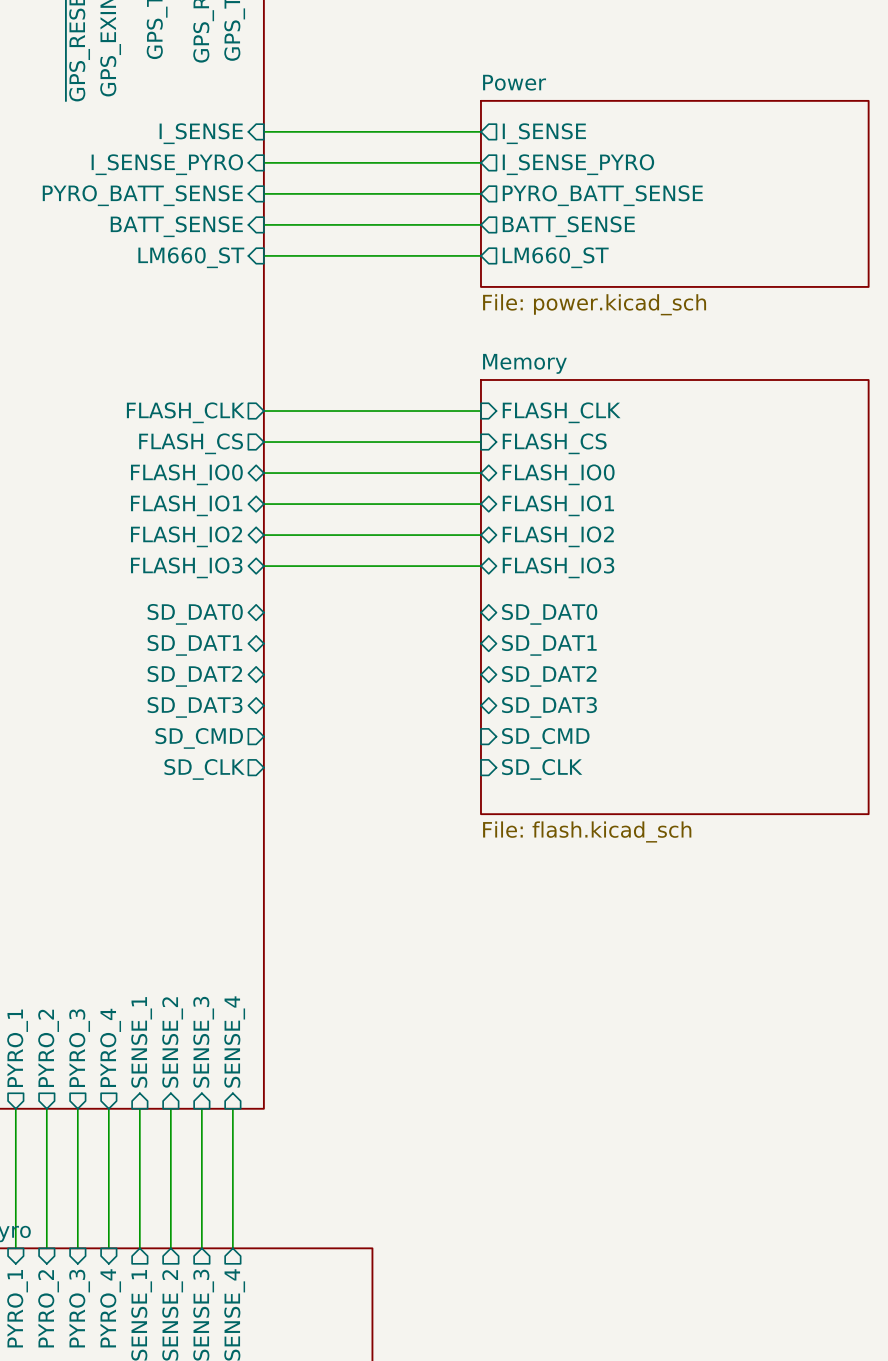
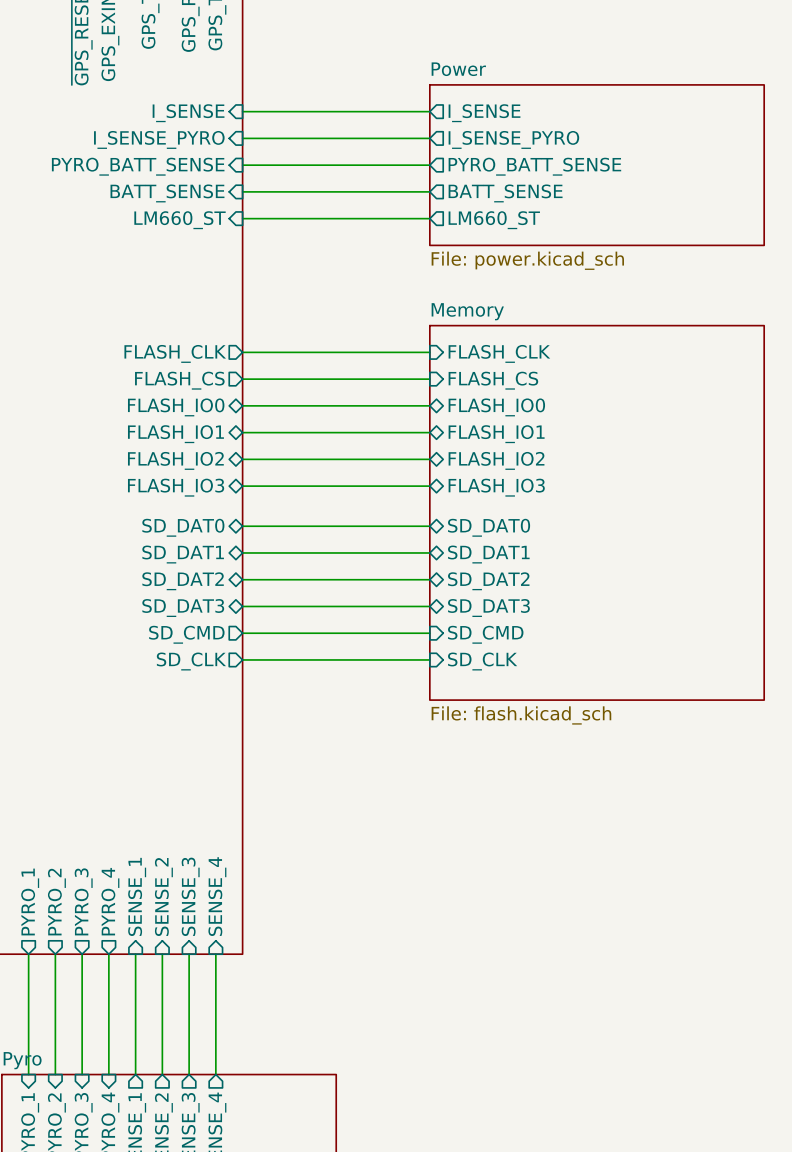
wire: none -> (242, 526) (429, 526)
wire: none -> (242, 552) (429, 552)
wire: none -> (242, 579) (429, 579)
wire: none -> (242, 606) (429, 606)
wire: none -> (242, 633) (429, 633)
wire: none -> (242, 659) (429, 659)

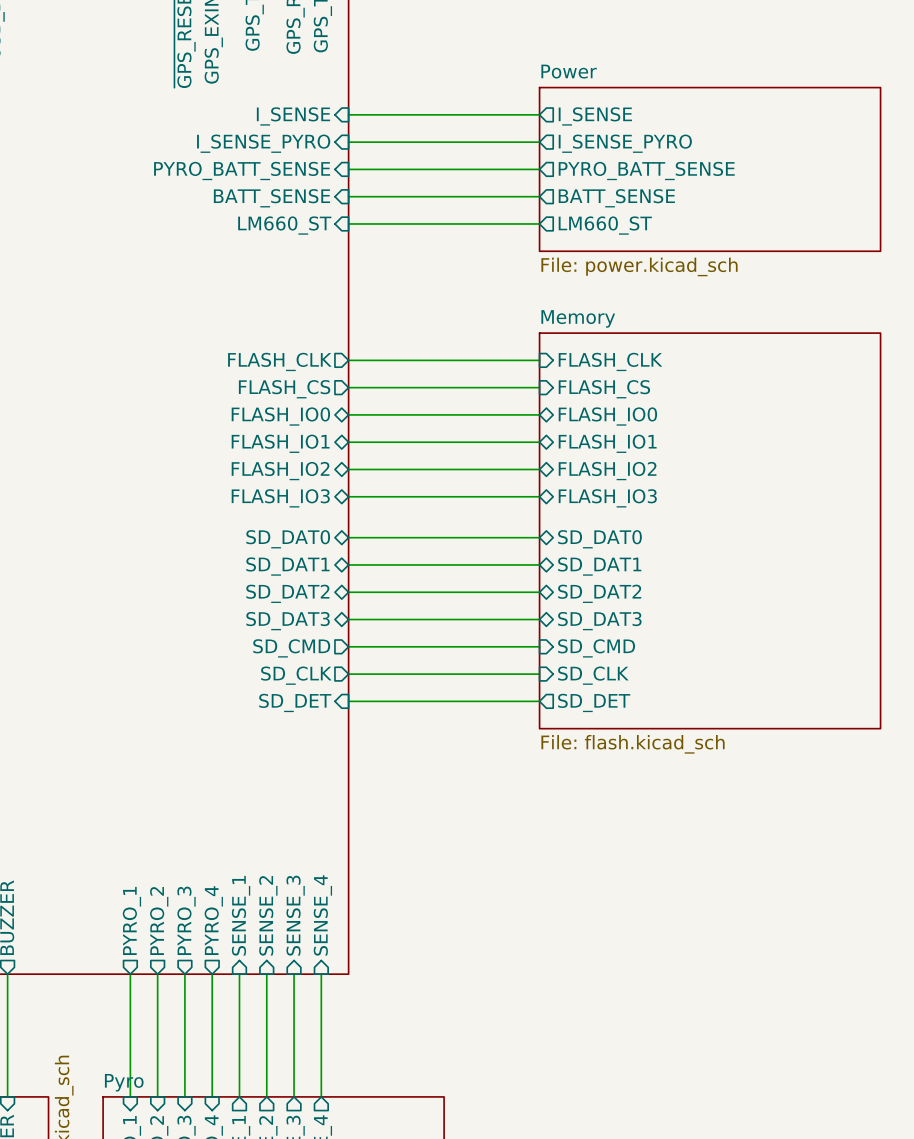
sheet Memory shape: [429, 324, 765, 701] -> [538, 332, 882, 730]
wire: none -> (348, 701) (539, 701)
sheet pin: none -> SD_DET (295, 702)
sheet pin: none -> SD_DET (594, 702)

